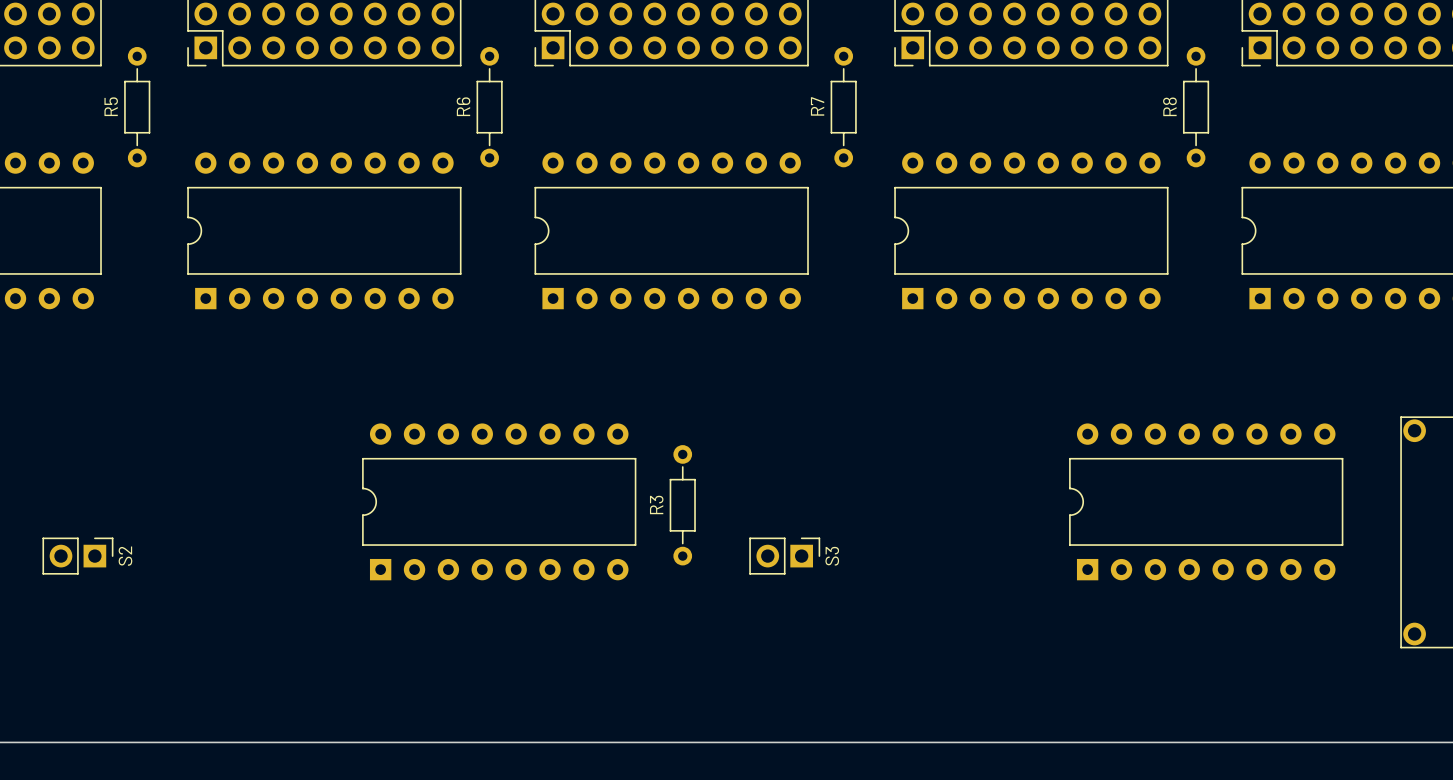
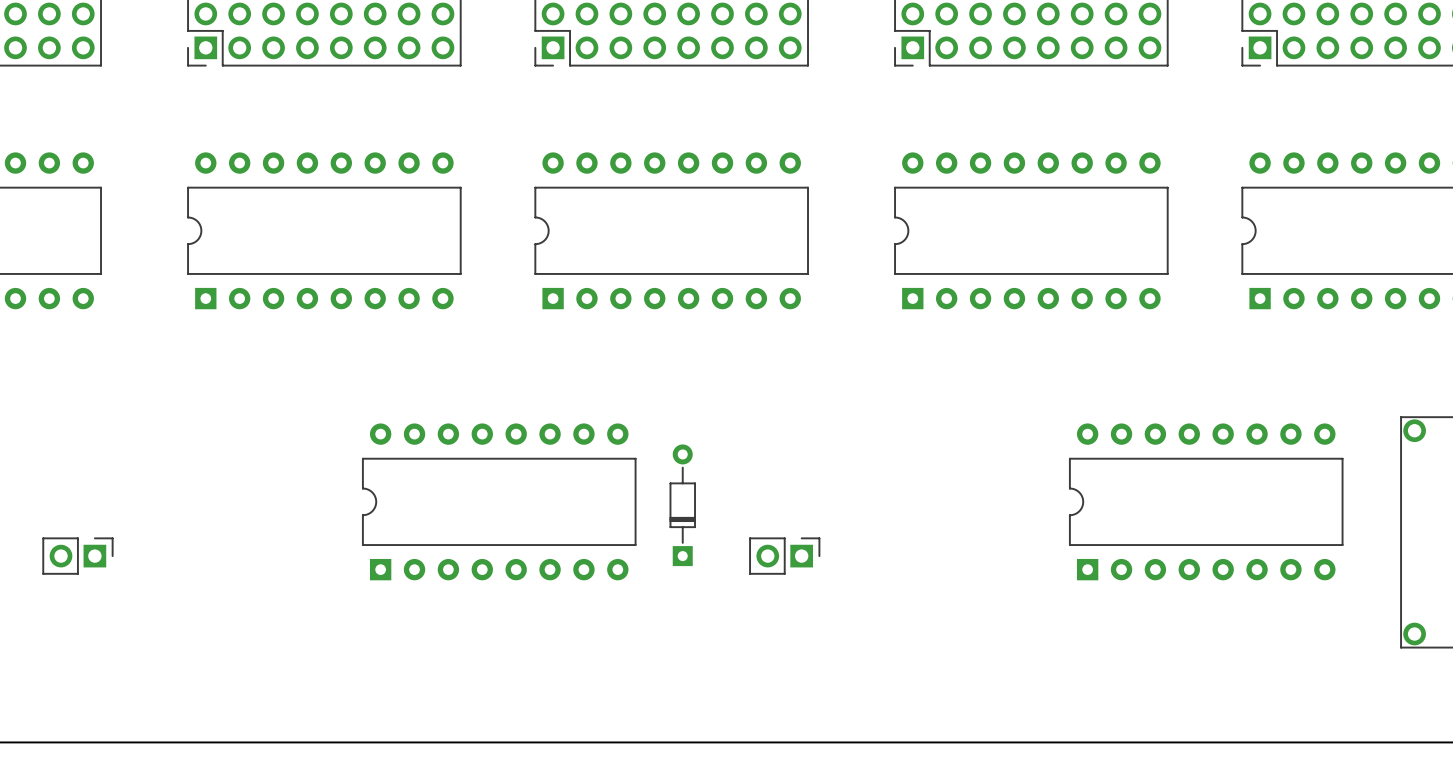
R5: (137, 107) -> none
R6: (489, 107) -> none
R7: (843, 107) -> none
R8: (1196, 107) -> none
R3: (682, 505) -> none
part: none -> (682, 505)
S2 name: S2 (125, 556) -> none
S3 name: S3 (832, 556) -> none

